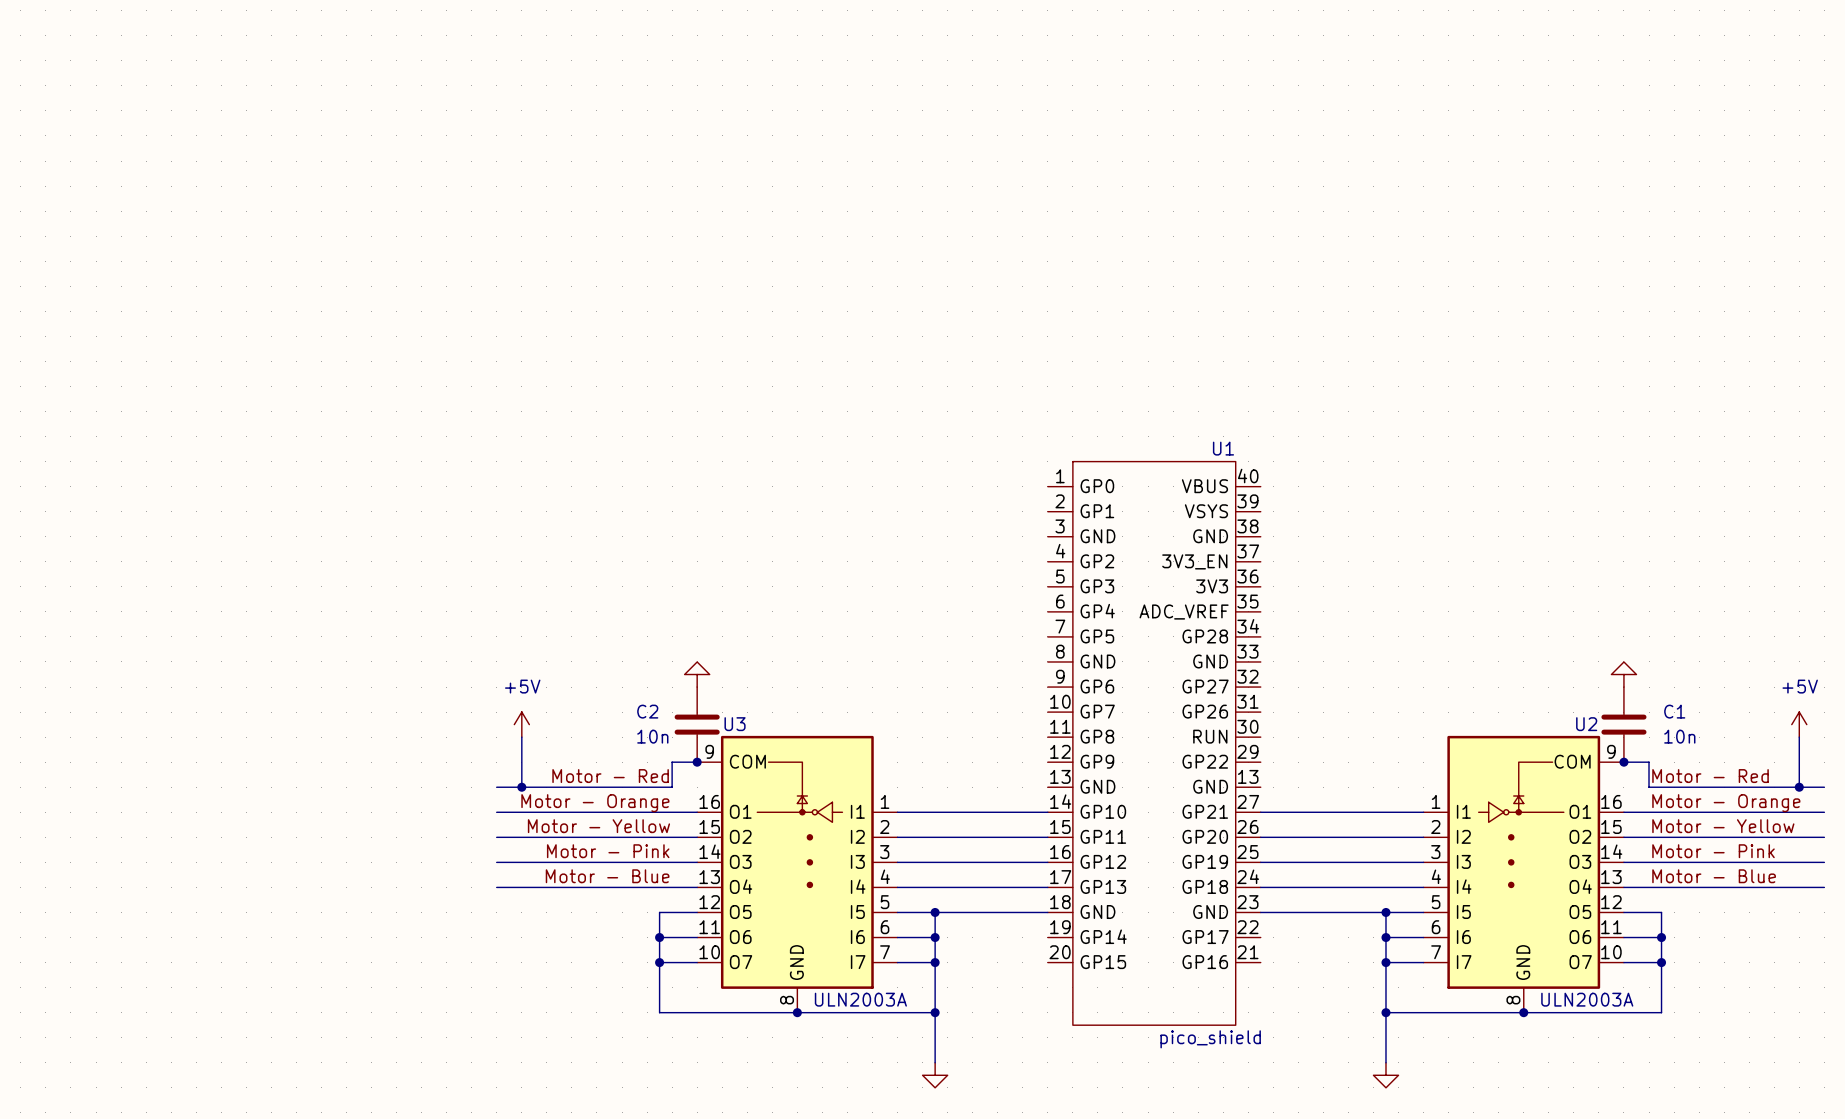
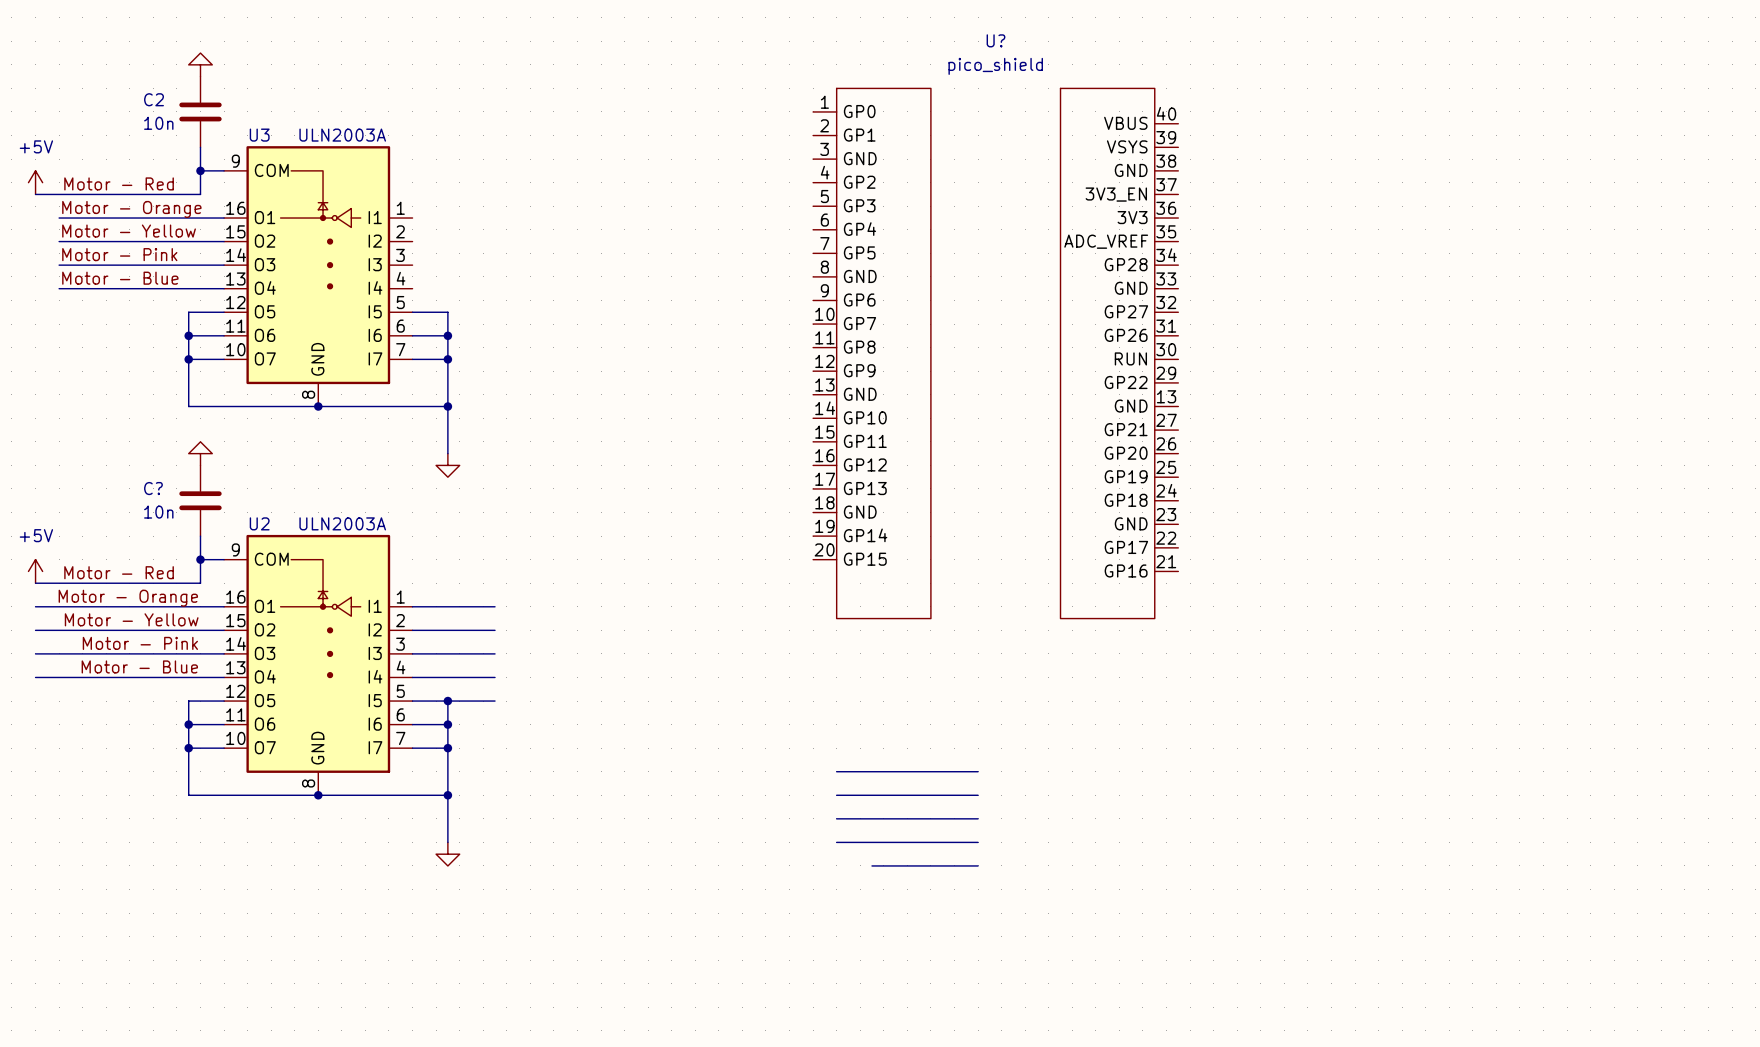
power symbol: none -> (200, 64)
wire: none -> (200, 147) (200, 194) (35, 194)
wire: none -> (200, 170) (224, 170)
junction: none -> (200, 170)
power symbol: none -> +5V (35, 182)
label: none -> Motor - Red (119, 183)
label: none -> Motor - Orange (131, 209)
wire: none -> (59, 218) (224, 218)
label: none -> Motor - Yellow (129, 231)
wire: none -> (59, 241) (224, 241)
label: none -> Motor - Pink (119, 254)
wire: none -> (59, 265) (224, 265)
label: none -> Motor - Blue (120, 278)
wire: none -> (59, 288) (224, 288)
wire: none -> (224, 312) (188, 312) (188, 406) (447, 406)
wire: none -> (412, 312) (447, 312) (447, 453)
wire: none -> (188, 335) (224, 335)
junction: none -> (188, 335)
wire: none -> (412, 335) (447, 335)
junction: none -> (447, 335)
U?: none -> pico_shield (995, 353)
wire: none -> (188, 359) (224, 359)
junction: none -> (188, 359)
wire: none -> (412, 359) (447, 359)
junction: none -> (447, 359)
junction: none -> (318, 406)
junction: none -> (447, 406)
power symbol: none -> (200, 453)
power symbol: none -> (447, 465)
C?: none -> 10n (200, 500)
wire: none -> (200, 536) (200, 583) (35, 583)
wire: none -> (200, 559) (224, 559)
junction: none -> (200, 559)
power symbol: none -> +5V (35, 571)
label: none -> Motor - Red (119, 572)
label: none -> Motor - Orange (128, 598)
wire: none -> (35, 606) (224, 606)
wire: none -> (412, 606) (495, 606)
label: none -> Motor - Yellow (131, 619)
wire: none -> (35, 630) (224, 630)
wire: none -> (412, 630) (495, 630)
power symbol: (697, 674) -> none
power symbol: (1623, 674) -> none
label: none -> Motor - Pink (140, 643)
wire: none -> (35, 653) (224, 653)
wire: none -> (412, 653) (495, 653)
label: none -> Motor - Blue (139, 666)
wire: none -> (35, 677) (224, 677)
wire: none -> (412, 677) (495, 677)
power symbol: +5V (521, 724) -> none
C2 position: (697, 724) -> (200, 111)
C1: 10n (1623, 724) -> none
power symbol: +5V (1799, 724) -> none
wire: none -> (224, 701) (188, 701) (188, 795) (447, 795)
wire: none -> (412, 701) (495, 701)
wire: none -> (447, 701) (447, 842)
junction: none -> (447, 701)
wire: (521, 737) (521, 787) -> none
wire: (1799, 737) (1799, 787) -> none
U1: pico_shield (1154, 743) -> none
wire: none -> (188, 724) (224, 724)
junction: none -> (188, 724)
wire: none -> (412, 724) (447, 724)
junction: none -> (447, 724)
wire: (697, 762) (672, 762) (672, 787) (496, 787) -> none
junction: (697, 762) -> none
wire: (1623, 762) (1649, 762) (1649, 787) (1824, 787) -> none
junction: (1623, 762) -> none
label: Motor - Red (610, 776) -> none
label: Motor - Red (1710, 776) -> none
wire: none -> (188, 748) (224, 748)
junction: none -> (188, 748)
wire: none -> (412, 748) (447, 748)
junction: none -> (447, 748)
junction: (521, 787) -> none
junction: (1799, 787) -> none
label: Motor - Orange (595, 803) -> none
label: Motor - Orange (1726, 803) -> none
wire: (496, 812) (697, 812) -> none
wire: (1260, 812) (1423, 812) -> none
wire: (1623, 812) (1824, 812) -> none
label: Motor - Yellow (598, 826) -> none
label: Motor - Yellow (1723, 826) -> none
junction: none -> (318, 795)
junction: none -> (447, 795)
wire: (496, 837) (697, 837) -> none
wire: (1260, 837) (1423, 837) -> none
wire: (1623, 837) (1824, 837) -> none
label: Motor - Pink (608, 851) -> none
label: Motor - Pink (1713, 851) -> none
wire: (496, 862) (697, 862) -> none
wire: (1260, 862) (1423, 862) -> none
U2 flip: as is (1523, 862) -> left-right (318, 653)
wire: (1623, 862) (1824, 862) -> none
U3 position: (797, 874) -> (318, 276)
U2 position: (1523, 874) -> (318, 665)
label: Motor - Blue (607, 876) -> none
label: Motor - Blue (1714, 876) -> none
wire: (496, 887) (697, 887) -> none
wire: (1260, 887) (1423, 887) -> none
wire: (1623, 887) (1824, 887) -> none
power symbol: none -> (447, 854)
wire: (697, 912) (659, 912) (659, 1012) (935, 1012) -> none
wire: (897, 912) (935, 912) (935, 1062) -> none
junction: (935, 912) -> none
wire: (1260, 912) (1423, 912) -> none
wire: (1385, 912) (1385, 1062) -> none
junction: (1385, 912) -> none
wire: (1623, 912) (1661, 912) (1661, 1012) (1385, 1012) -> none
wire: (659, 937) (697, 937) -> none
junction: (659, 937) -> none
wire: (897, 937) (935, 937) -> none
junction: (935, 937) -> none
wire: (1385, 937) (1423, 937) -> none
junction: (1385, 937) -> none
wire: (1623, 937) (1661, 937) -> none
junction: (1661, 937) -> none
wire: (659, 962) (697, 962) -> none
junction: (659, 962) -> none
wire: (897, 962) (935, 962) -> none
junction: (935, 962) -> none
wire: (1385, 962) (1423, 962) -> none
junction: (1385, 962) -> none
wire: (1623, 962) (1661, 962) -> none
junction: (1661, 962) -> none
U3 value position: ULN2003A (860, 999) -> ULN2003A (342, 135)
U2 value position: ULN2003A (1587, 999) -> ULN2003A (342, 523)
junction: (797, 1012) -> none
junction: (935, 1012) -> none
junction: (1385, 1012) -> none
junction: (1523, 1012) -> none
power symbol: (935, 1075) -> none
power symbol: (1385, 1075) -> none

